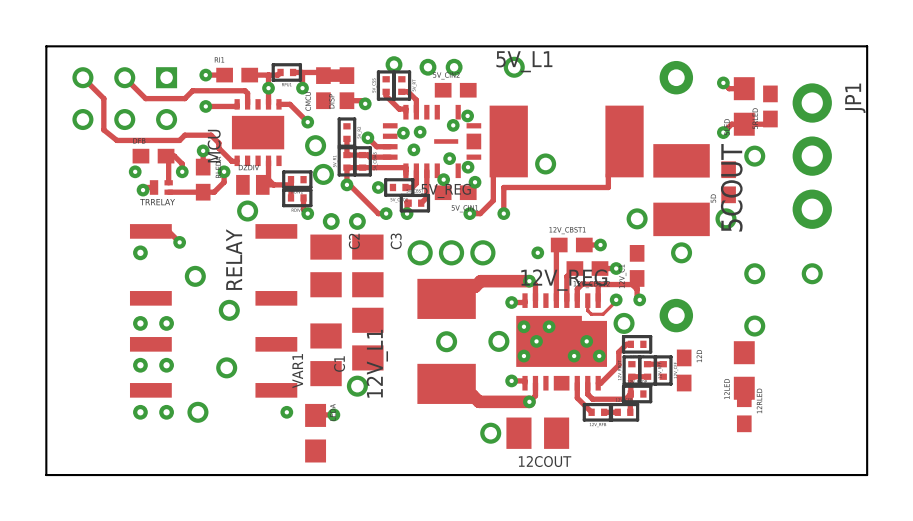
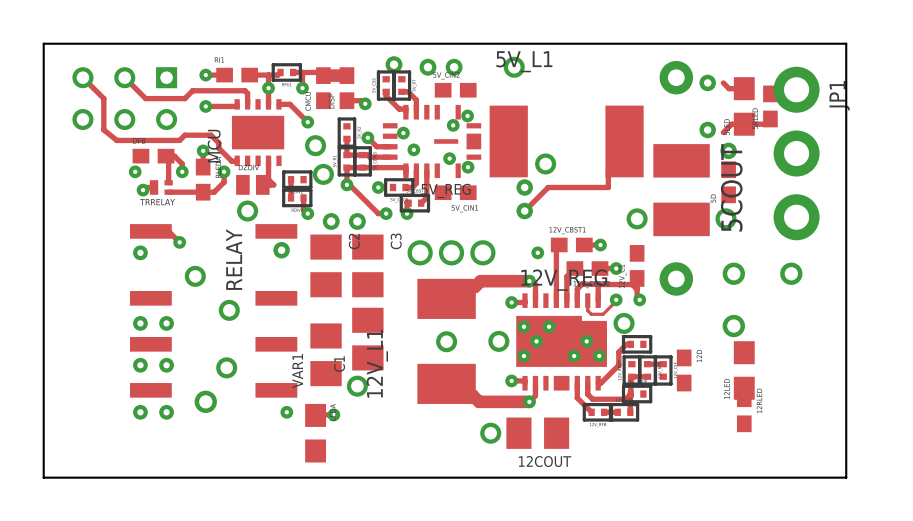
board edge: (46, 46) (867, 46) (867, 475) (46, 475) (46, 46) -> (43, 43) (43, 477) (846, 477) (846, 43) (43, 43)
via: none -> (707, 82)
via: (723, 82) -> none
JP1 footprint: [792, 83, 832, 229] -> [773, 66, 820, 241]
via: none -> (707, 129)
via: (420, 132) -> none
via: (723, 132) -> none
via: none -> (728, 150)
via: (754, 156) -> none
track: (493, 174) (493, 200) (480, 213) (469, 213) -> none
via: (443, 179) -> none
via: (475, 182) -> none
track: (273, 184) (291, 184) -> none
via: none -> (524, 187)
track: (548, 187) (503, 187) (503, 213) -> (548, 187) (524, 211)
via: none -> (524, 211)
via: (469, 213) -> none
via: (503, 213) -> none
via: none -> (281, 250)
via: (681, 252) -> none
via position: (754, 273) -> (733, 273)
via position: (812, 273) -> (791, 273)
part position: (676, 315) -> (676, 278)
via position: (754, 326) -> (733, 326)
via position: (197, 412) -> (205, 401)

